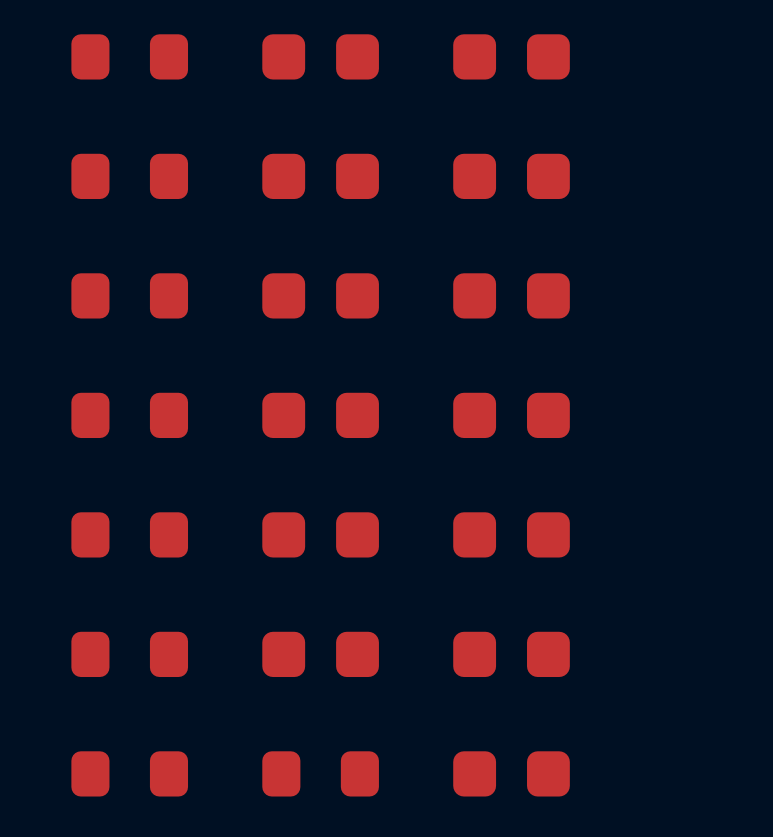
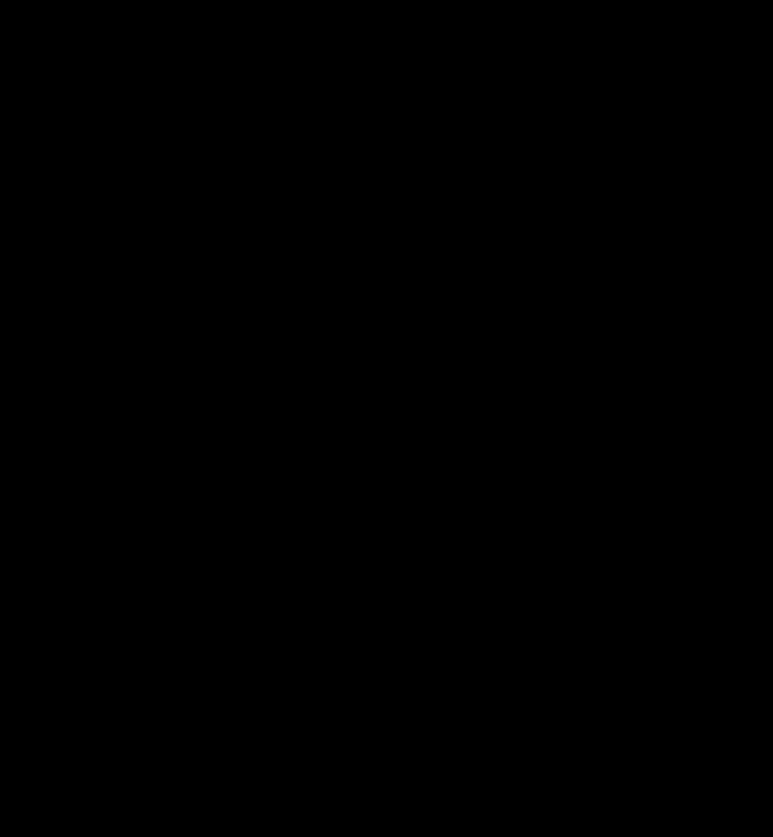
part: (129, 56) -> none
part: (320, 56) -> none
part: (511, 56) -> none
part: (129, 176) -> none
part: (320, 176) -> none
part: (511, 176) -> none
part: (129, 295) -> none
part: (320, 295) -> none
part: (511, 295) -> none
part: (129, 415) -> none
part: (320, 415) -> none
part: (511, 415) -> none
part: (129, 534) -> none
part: (320, 534) -> none
part: (511, 534) -> none
part: (129, 654) -> none
part: (320, 654) -> none
part: (511, 654) -> none
part: (129, 773) -> none
part: (320, 773) -> none
part: (511, 773) -> none

